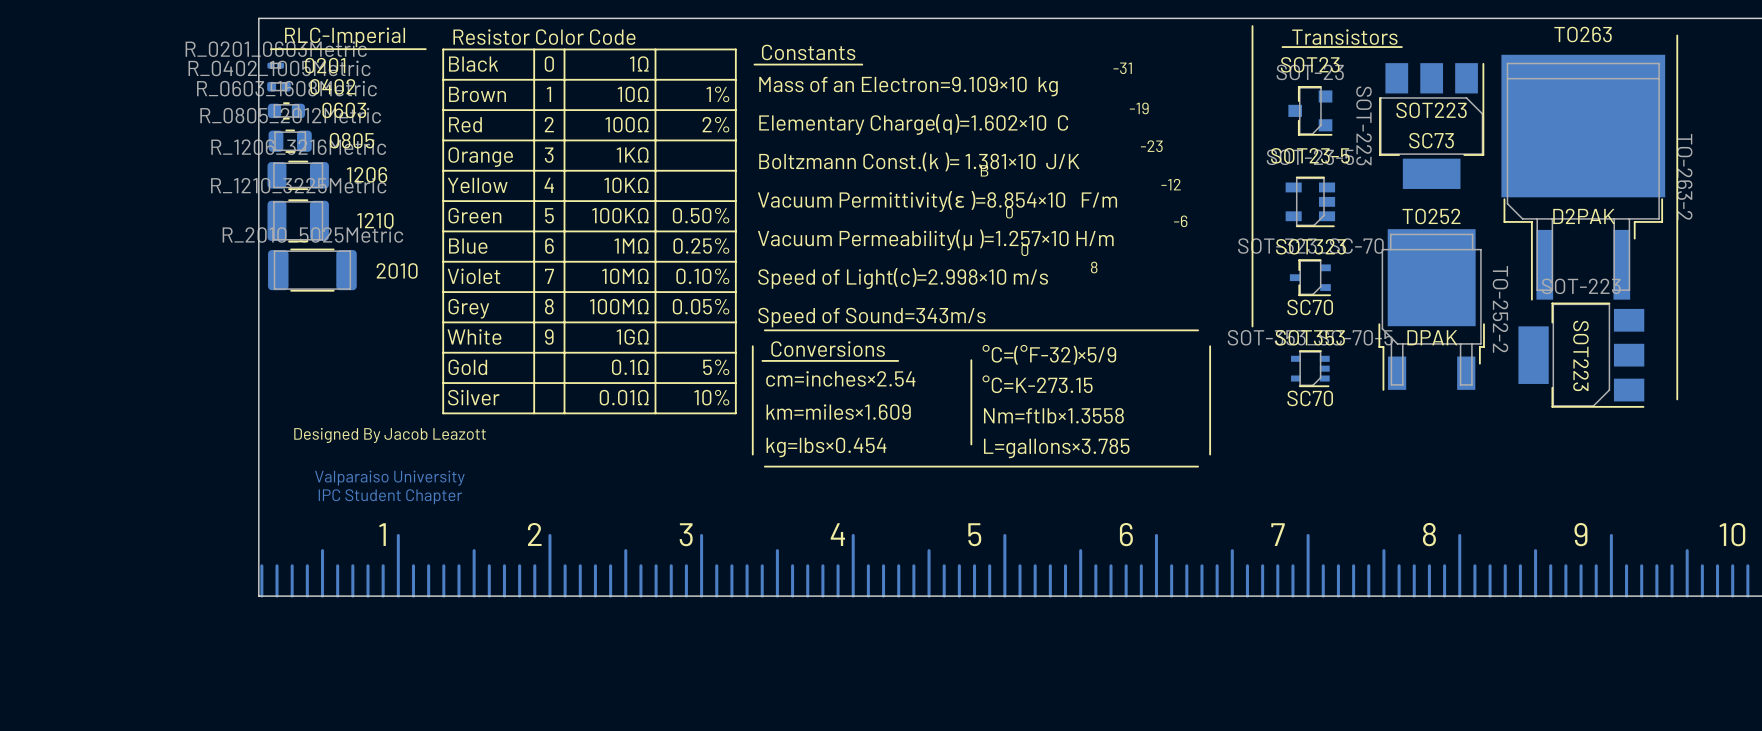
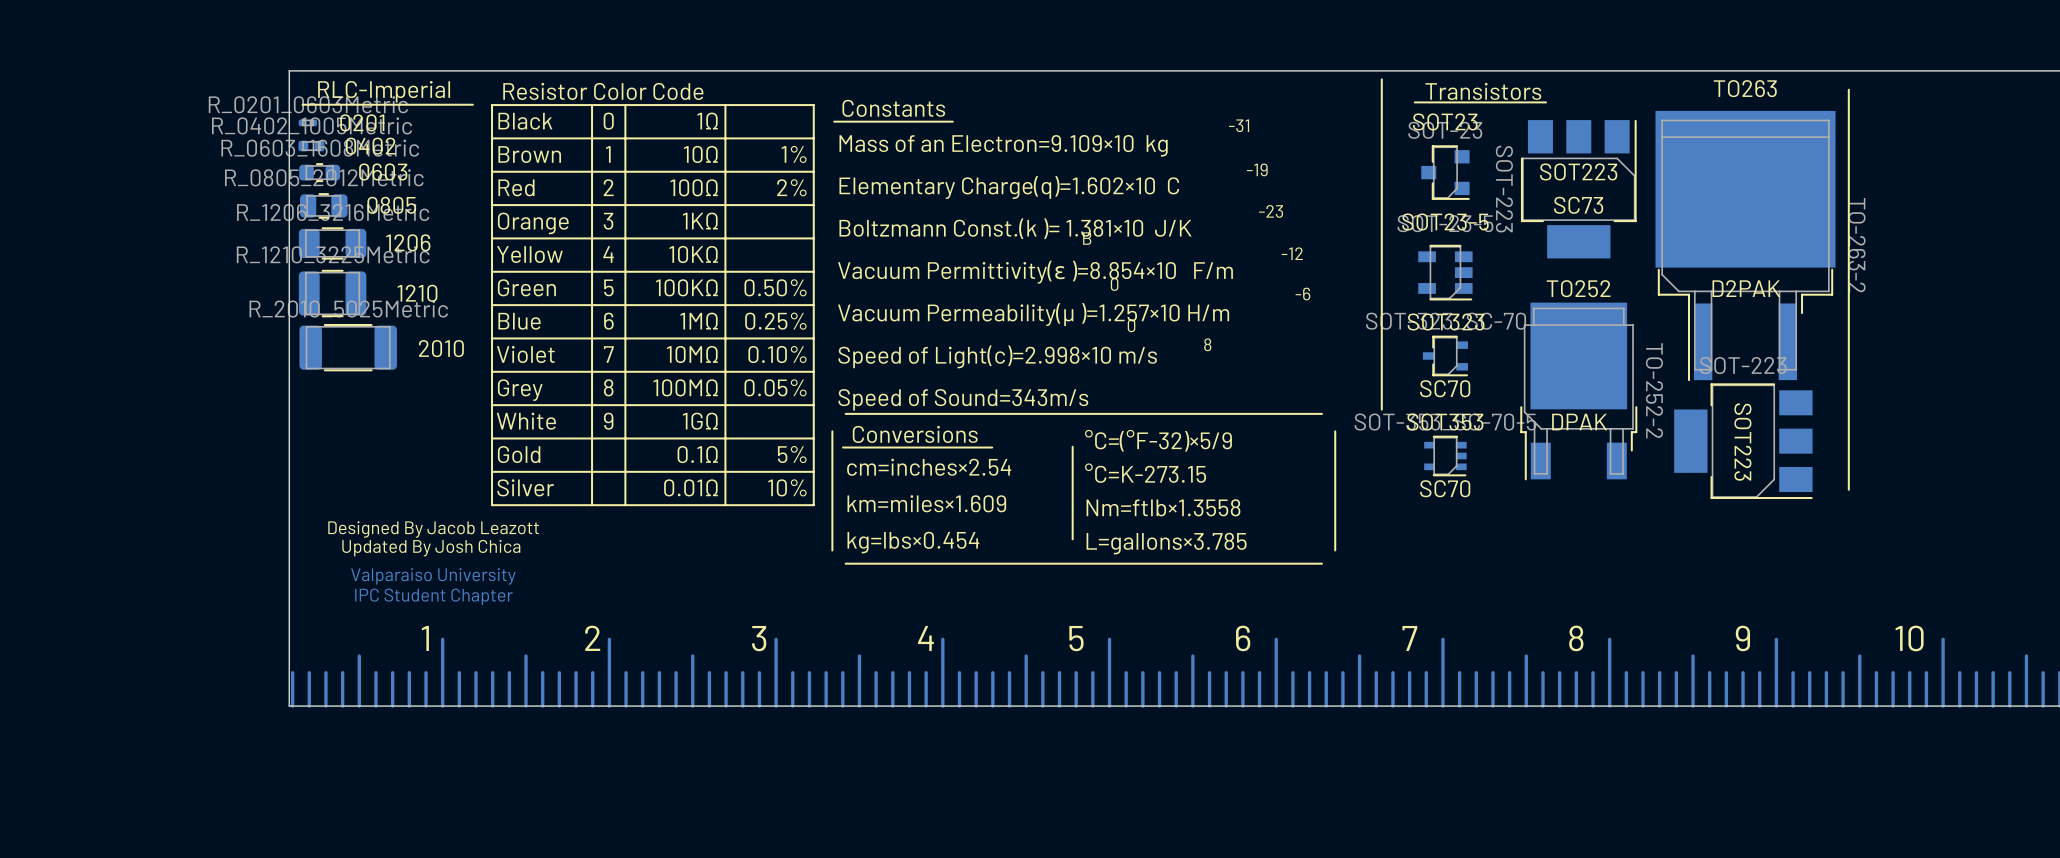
text: none -> Updated By Josh Chica (431, 548)

